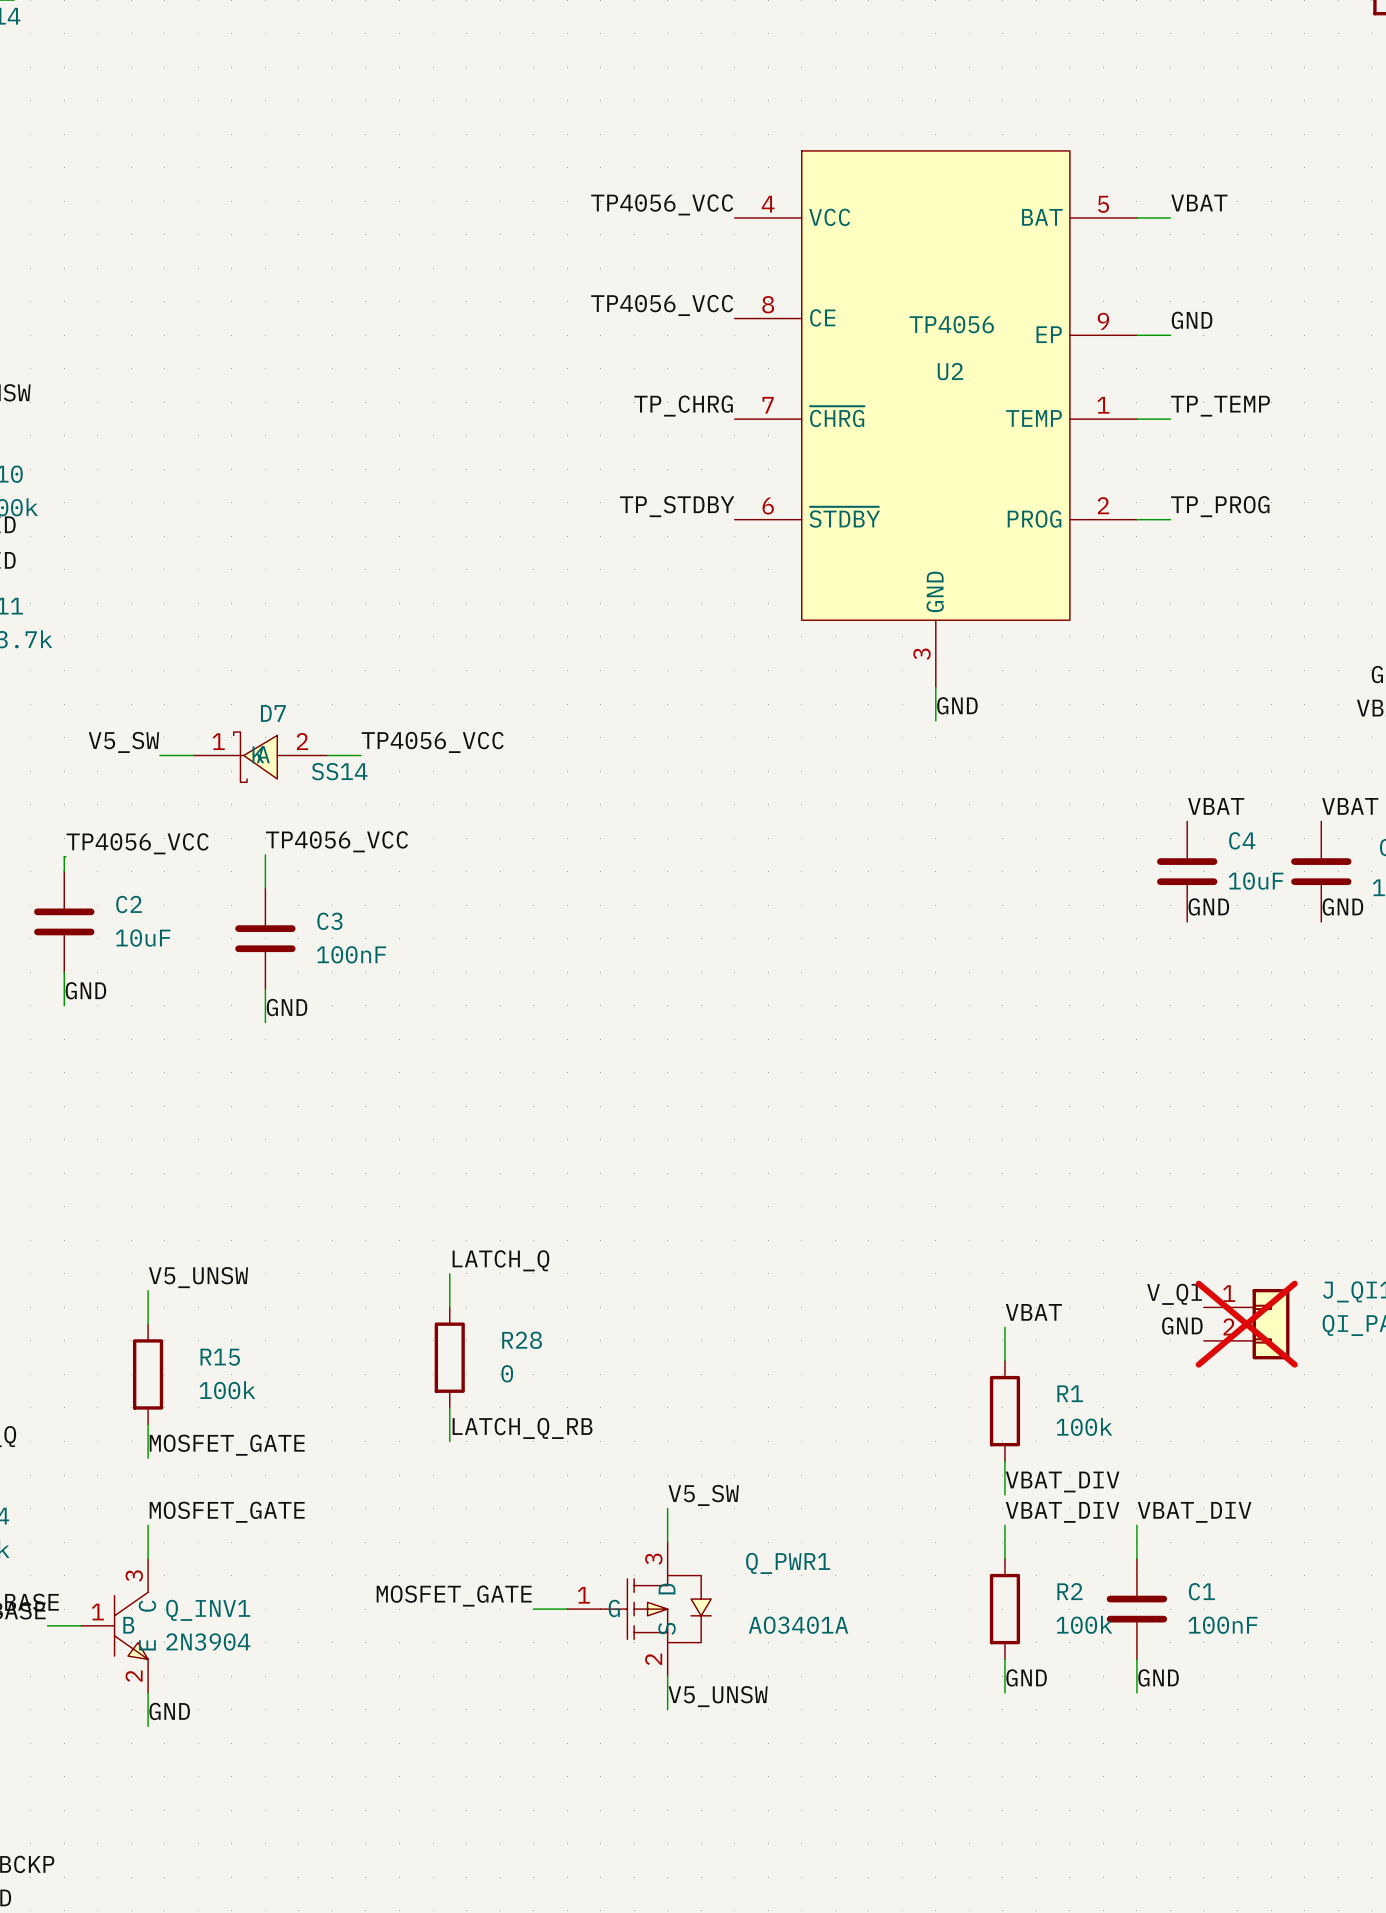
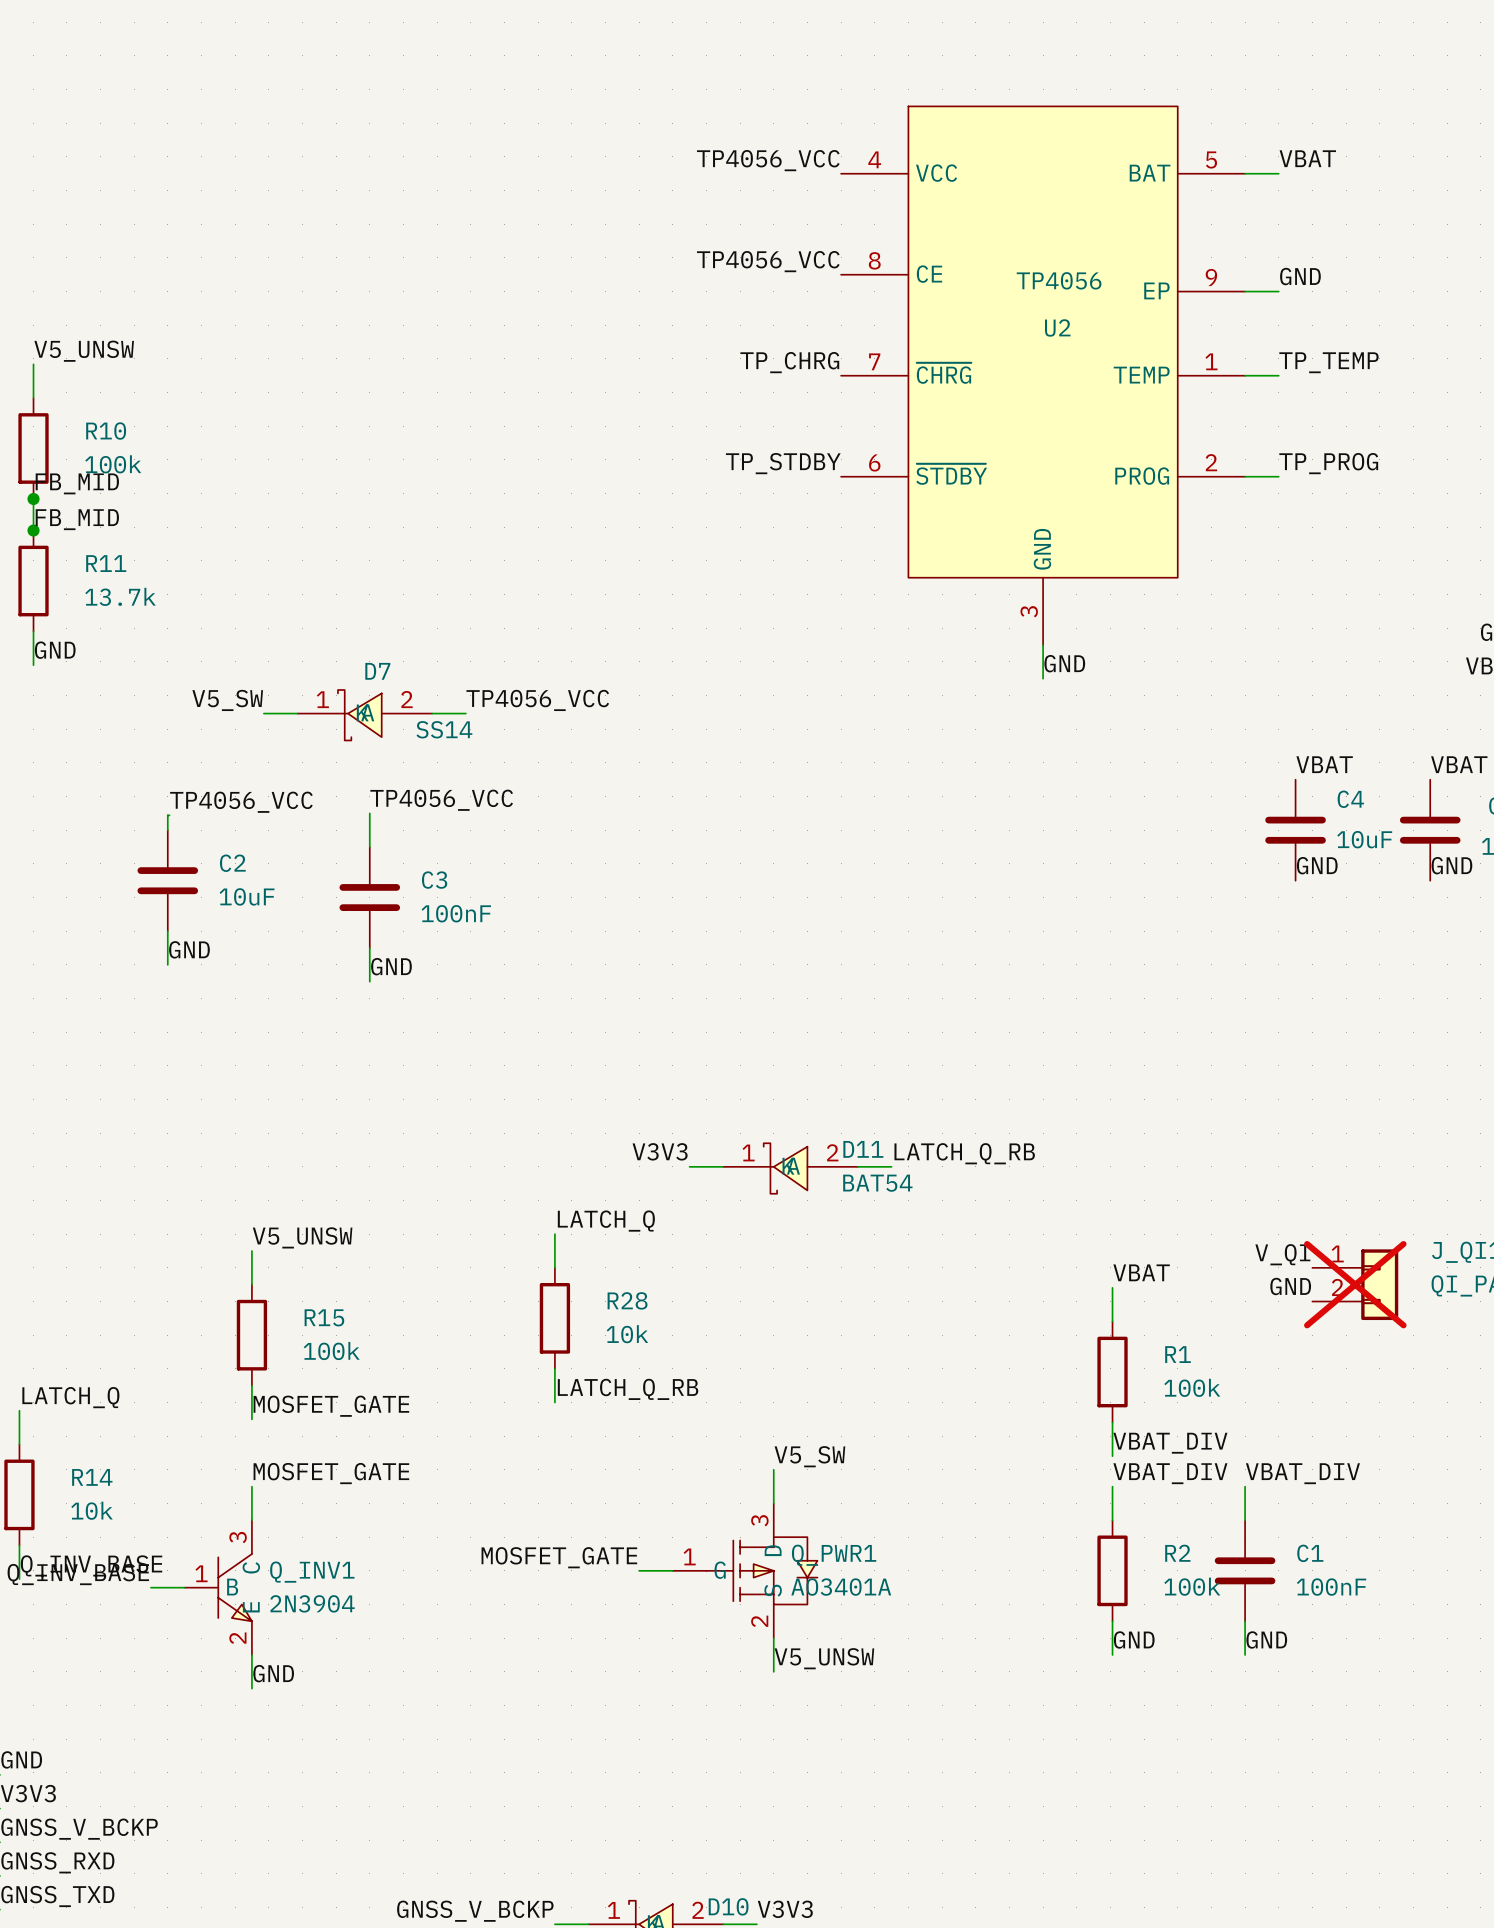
label: none -> V3V3 (660, 1151)
label: none -> LATCH_Q_RB (964, 1153)
wire: none -> (689, 1166) (723, 1166)
wire: none -> (857, 1166) (891, 1166)
D11: none -> BAT54 (790, 1168)
R28 value: 0 (507, 1373) -> 10k (627, 1334)
Q_PWR1 name position: Q_PWR1 (788, 1563) -> Q_PWR1 (834, 1555)
Q_PWR1 value position: AO3401A (798, 1625) -> AO3401A (841, 1587)

